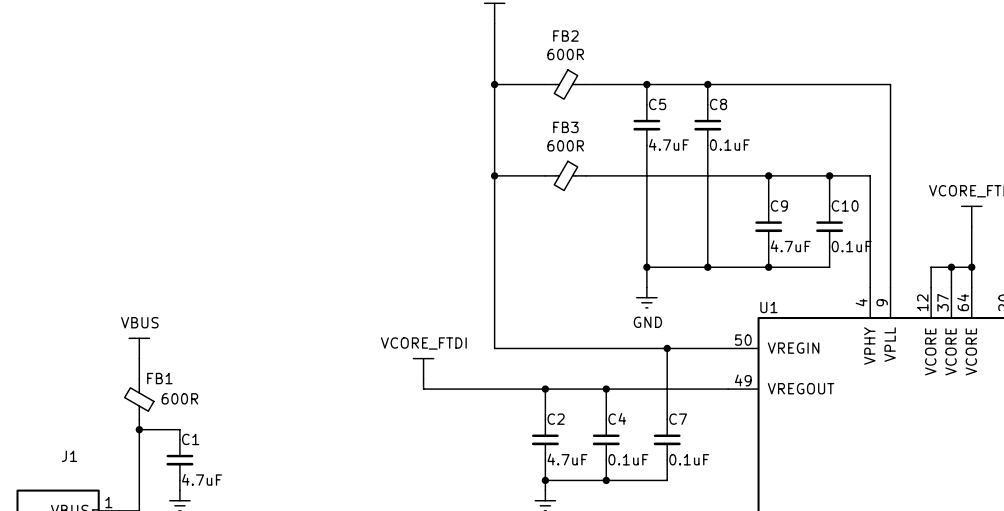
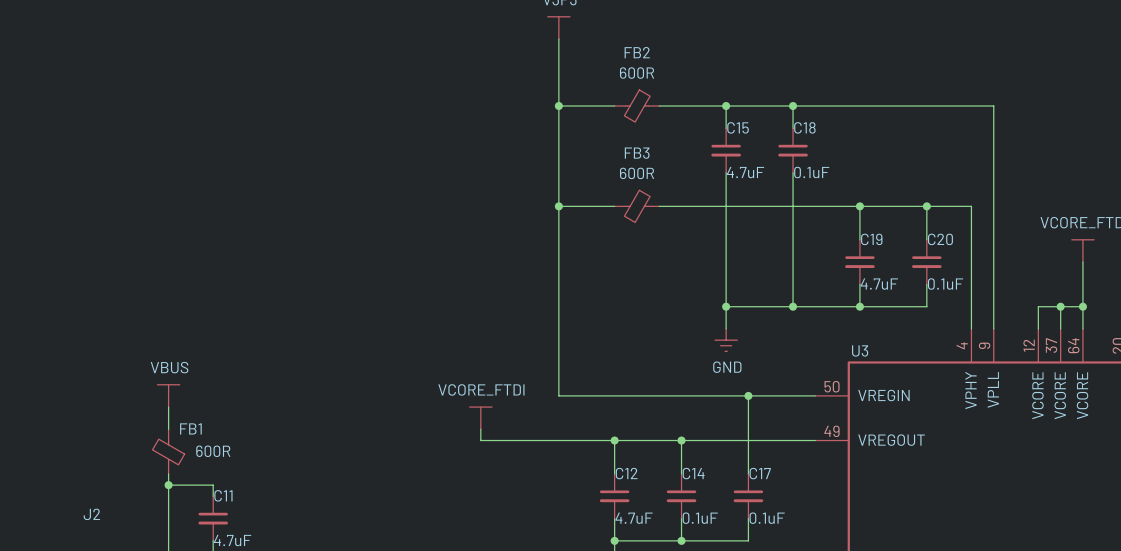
C5 name: C5 (657, 104) -> C15 (738, 127)
C8 name: C8 (718, 104) -> C18 (804, 127)
C9 name: C9 (779, 205) -> C19 (871, 239)
C10 name: C10 (845, 205) -> C20 (940, 239)
U1 name: U1 (768, 307) -> U3 (860, 350)
C4 name: C4 (617, 418) -> C14 (693, 473)
C2 name: C2 (556, 419) -> C12 (626, 473)
C7 name: C7 (678, 419) -> C17 (760, 473)
C1 name: C1 (190, 439) -> C11 (223, 495)
J1 name: J1 (69, 456) -> J2 (91, 514)

